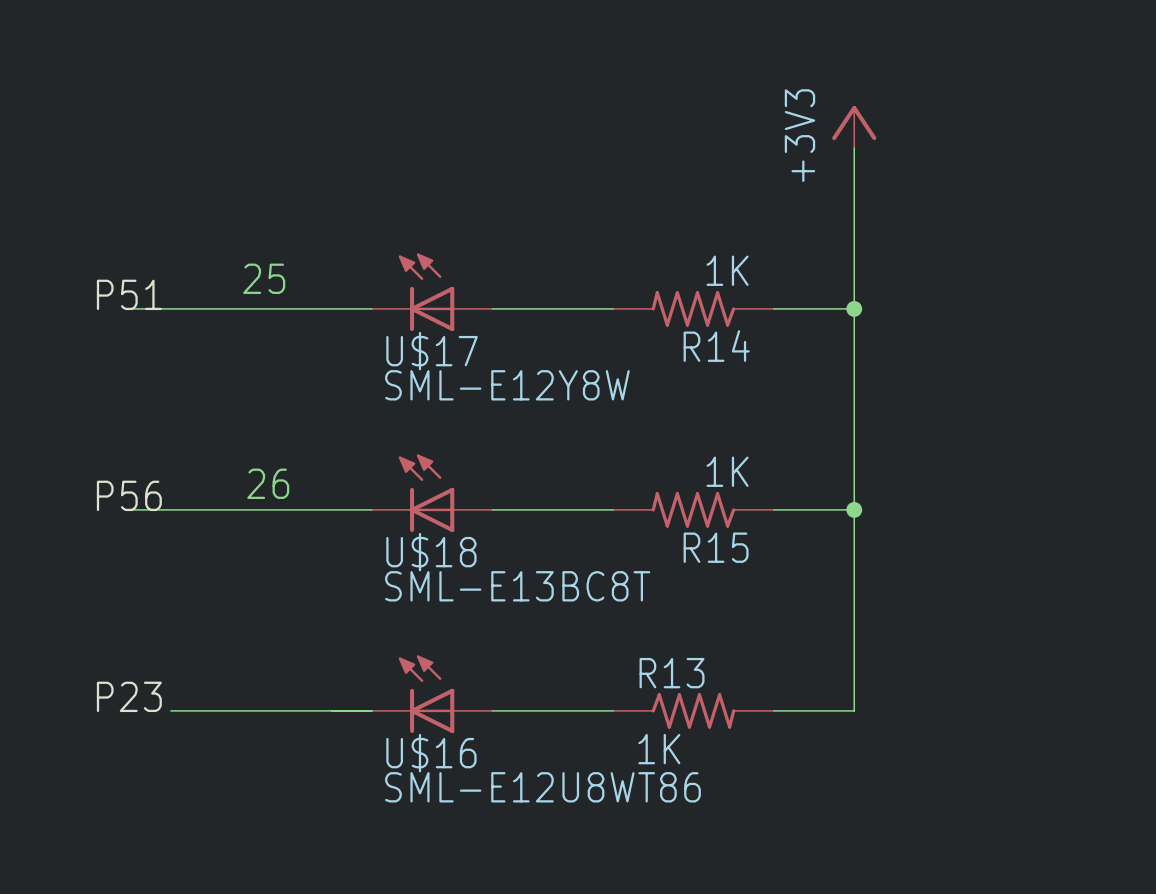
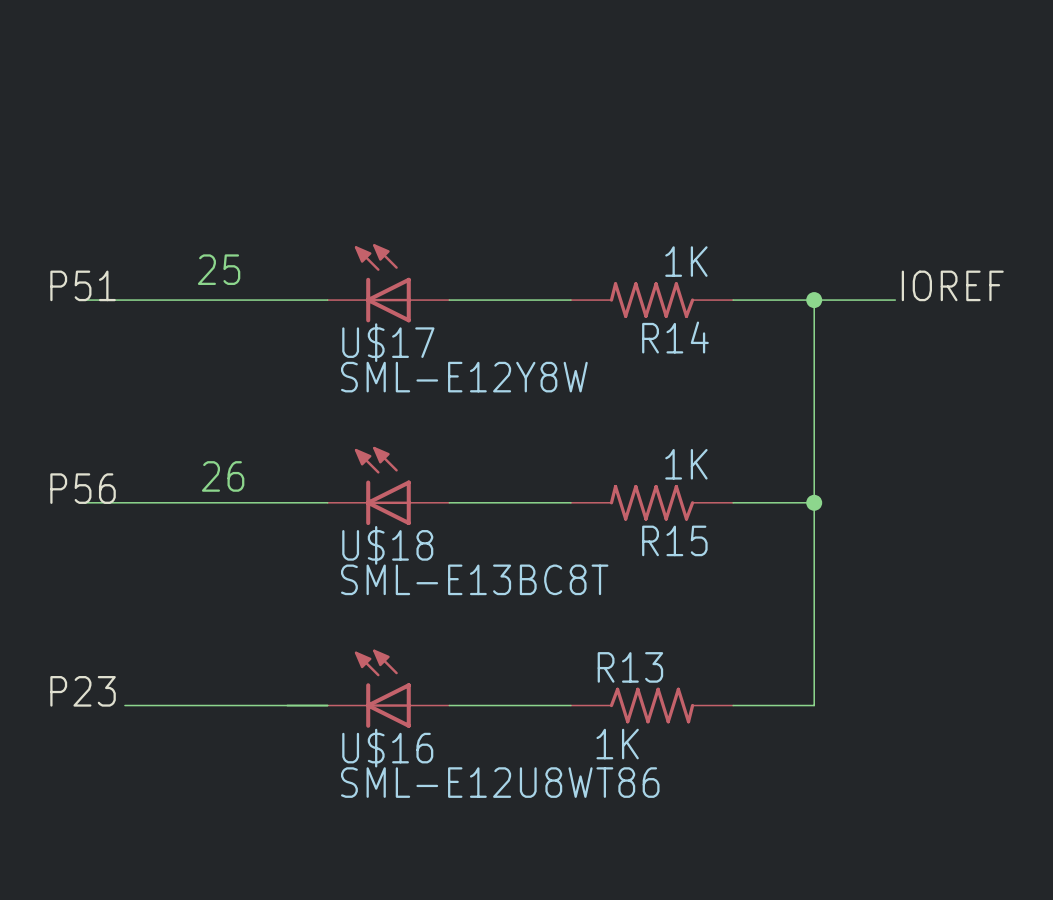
power symbol: +3V3 (854, 127) -> none
wire: (854, 148) (854, 308) -> (895, 300) (814, 300)
label: none -> IOREF (952, 285)

